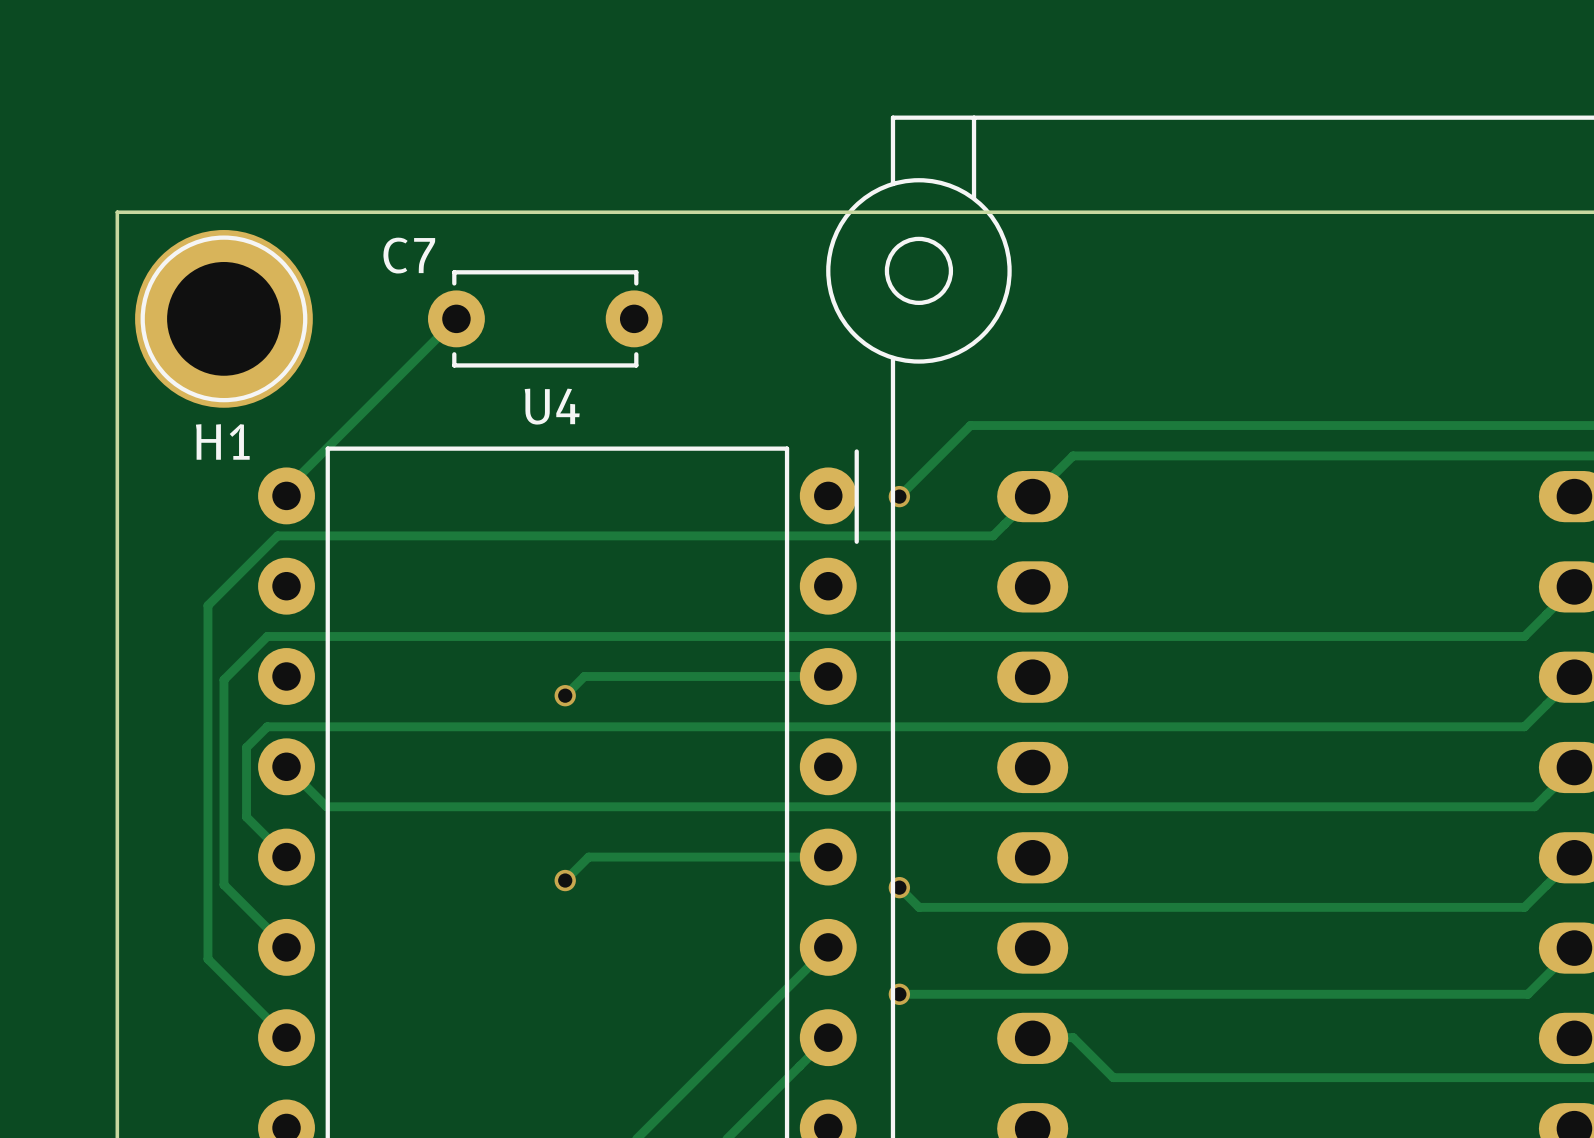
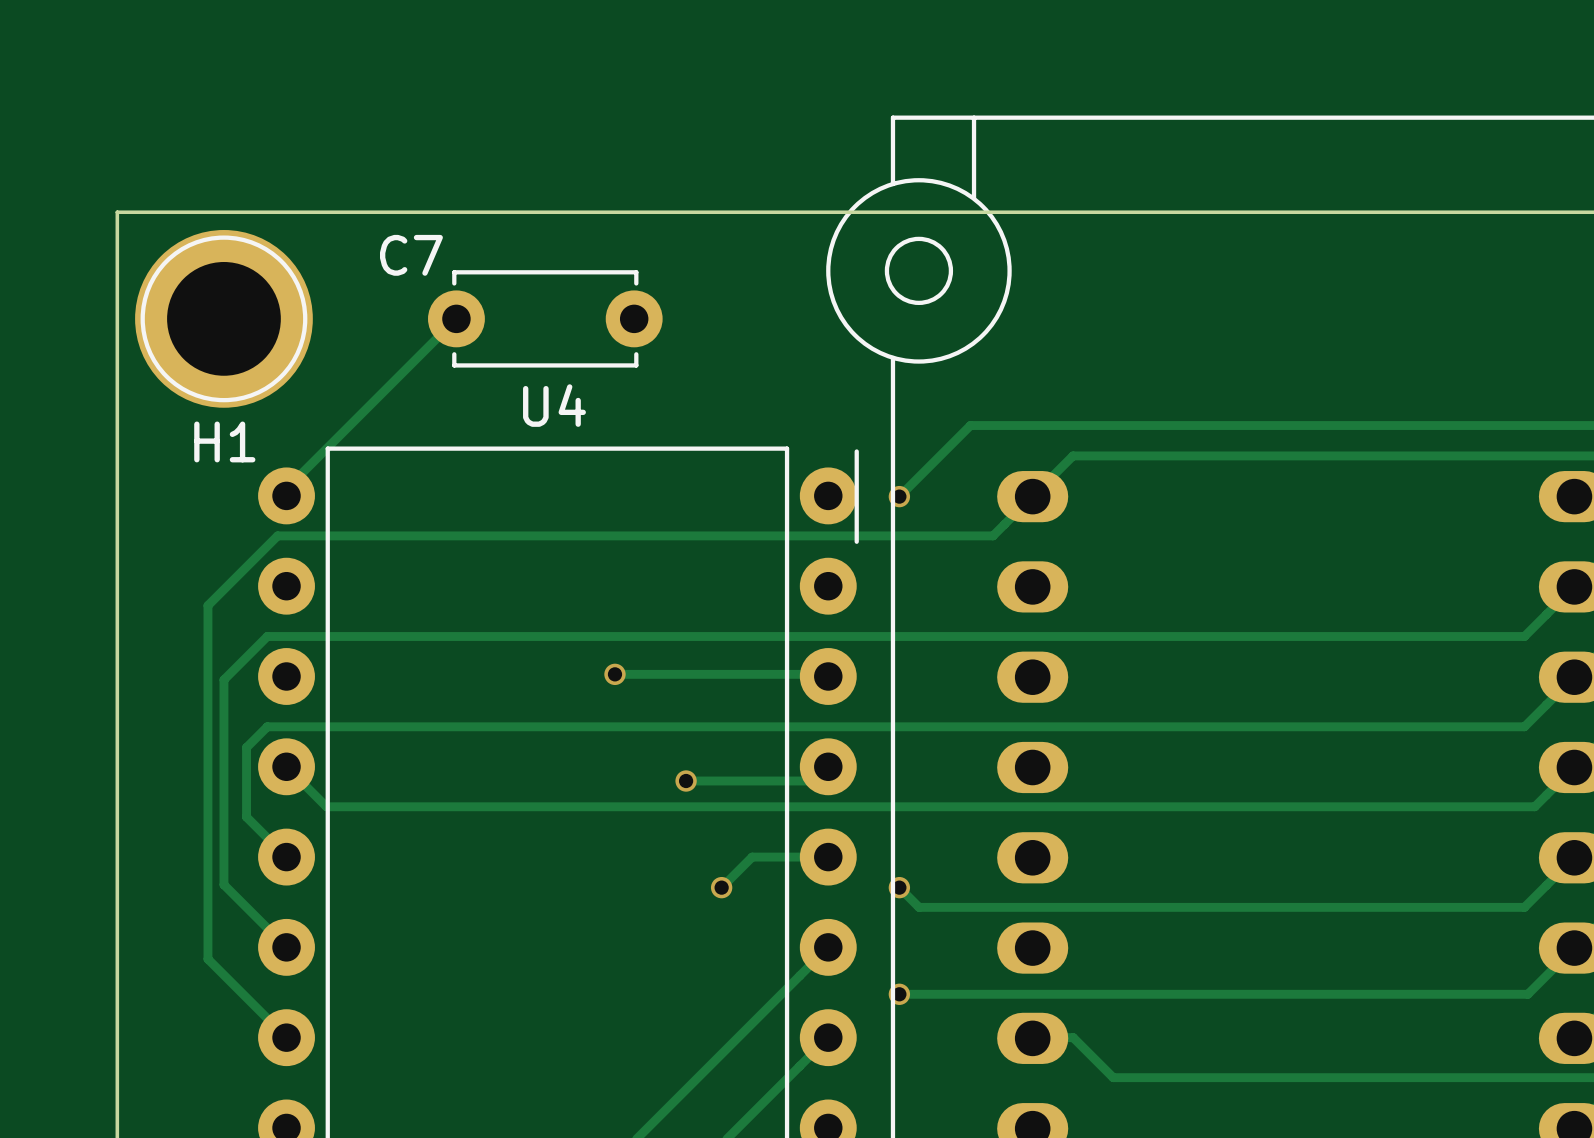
track: (828, 676) (584, 676) (565, 695) -> (828, 676) (826, 674) (614, 674)
via position: (565, 695) -> (614, 674)
track: none -> (828, 766) (814, 781) (686, 781)
via: none -> (686, 781)
track: (752, 857) (588, 857) (565, 880) -> (752, 857) (721, 887)
via: (565, 880) -> none
via: none -> (721, 887)

